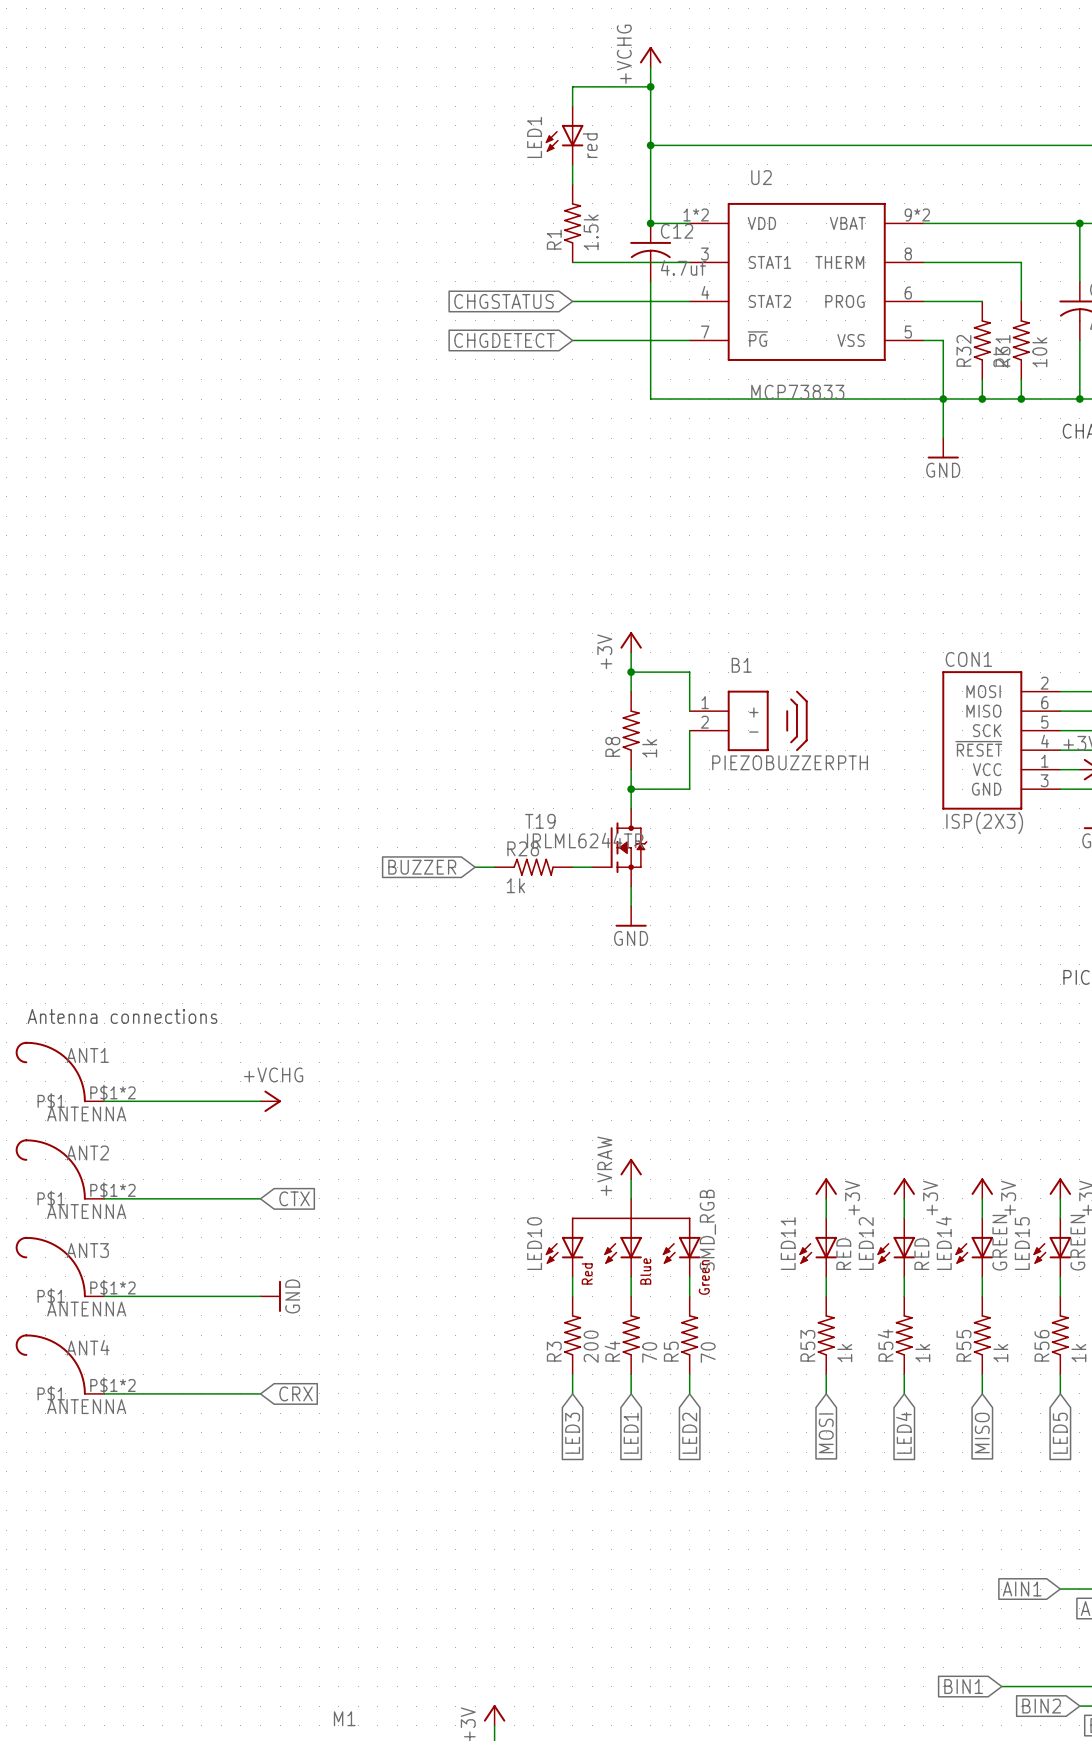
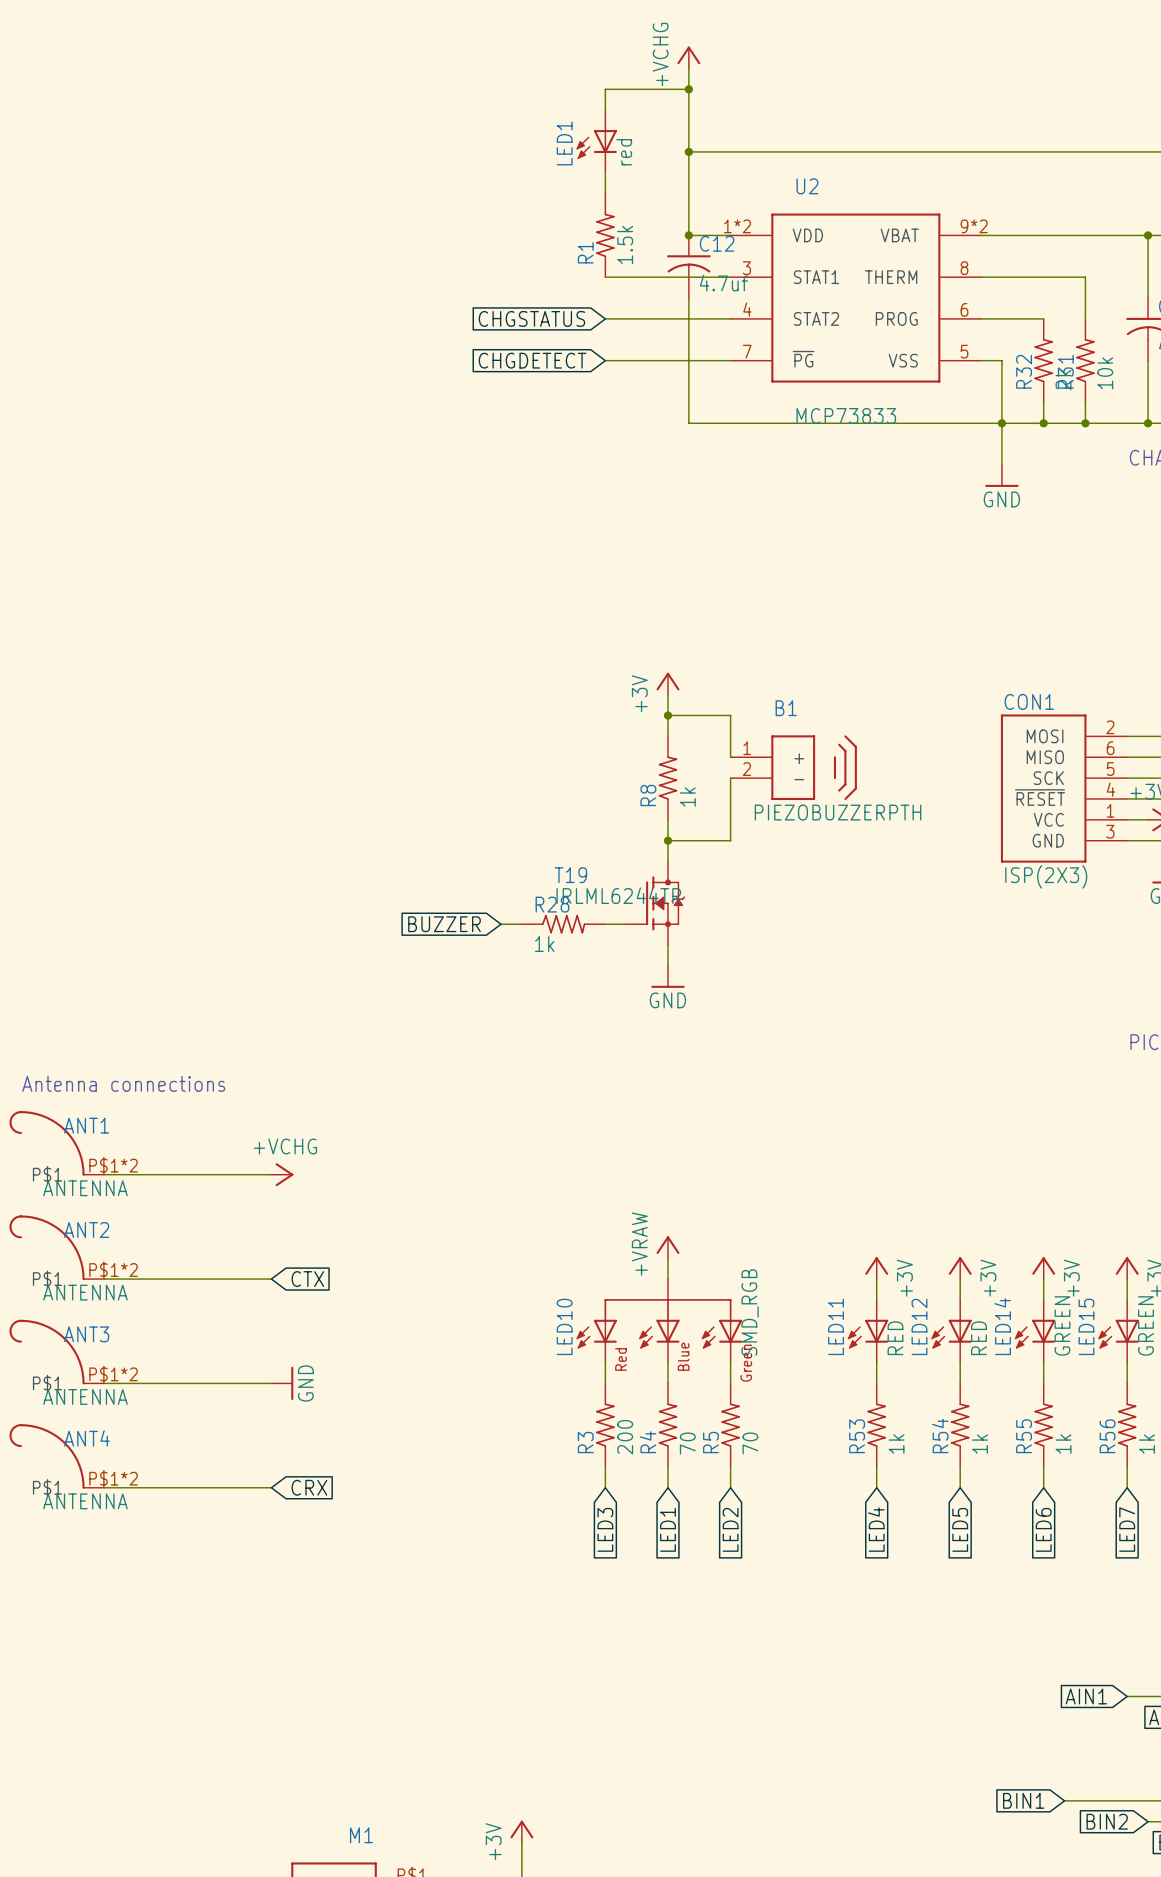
global label: LED4 (903, 1432) -> LED5 (960, 1529)
global label: MISO (982, 1432) -> LED6 (1043, 1529)
global label: MOSI (826, 1433) -> LED4 (876, 1529)
global label: LED5 (1060, 1433) -> LED7 (1127, 1529)

